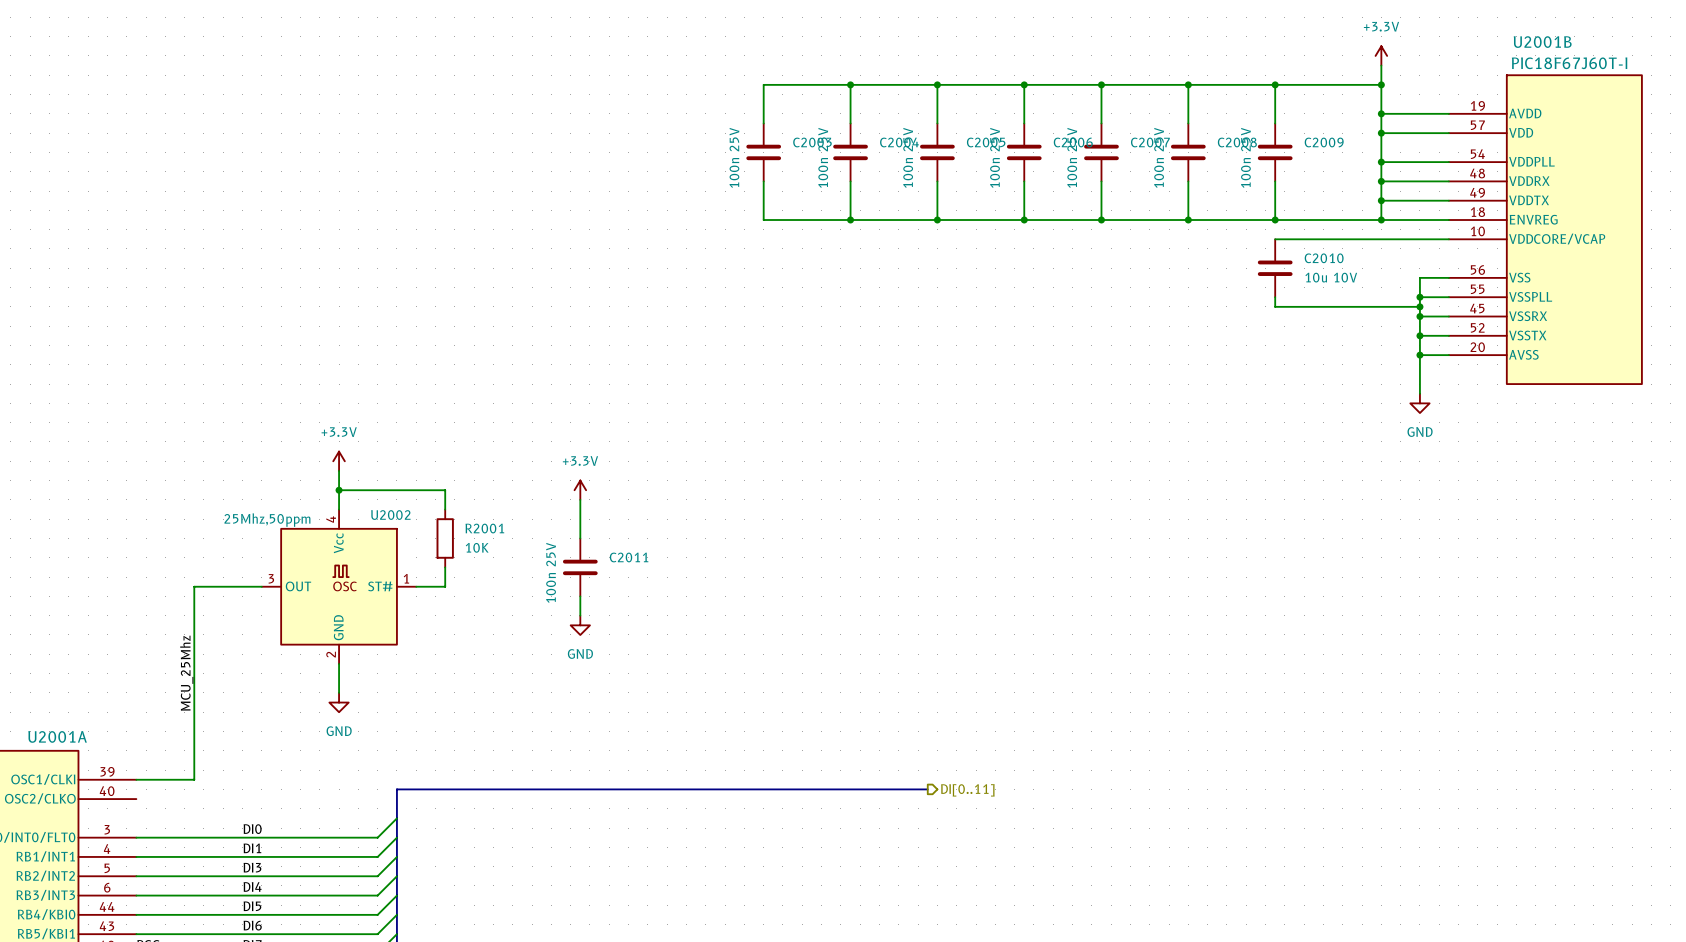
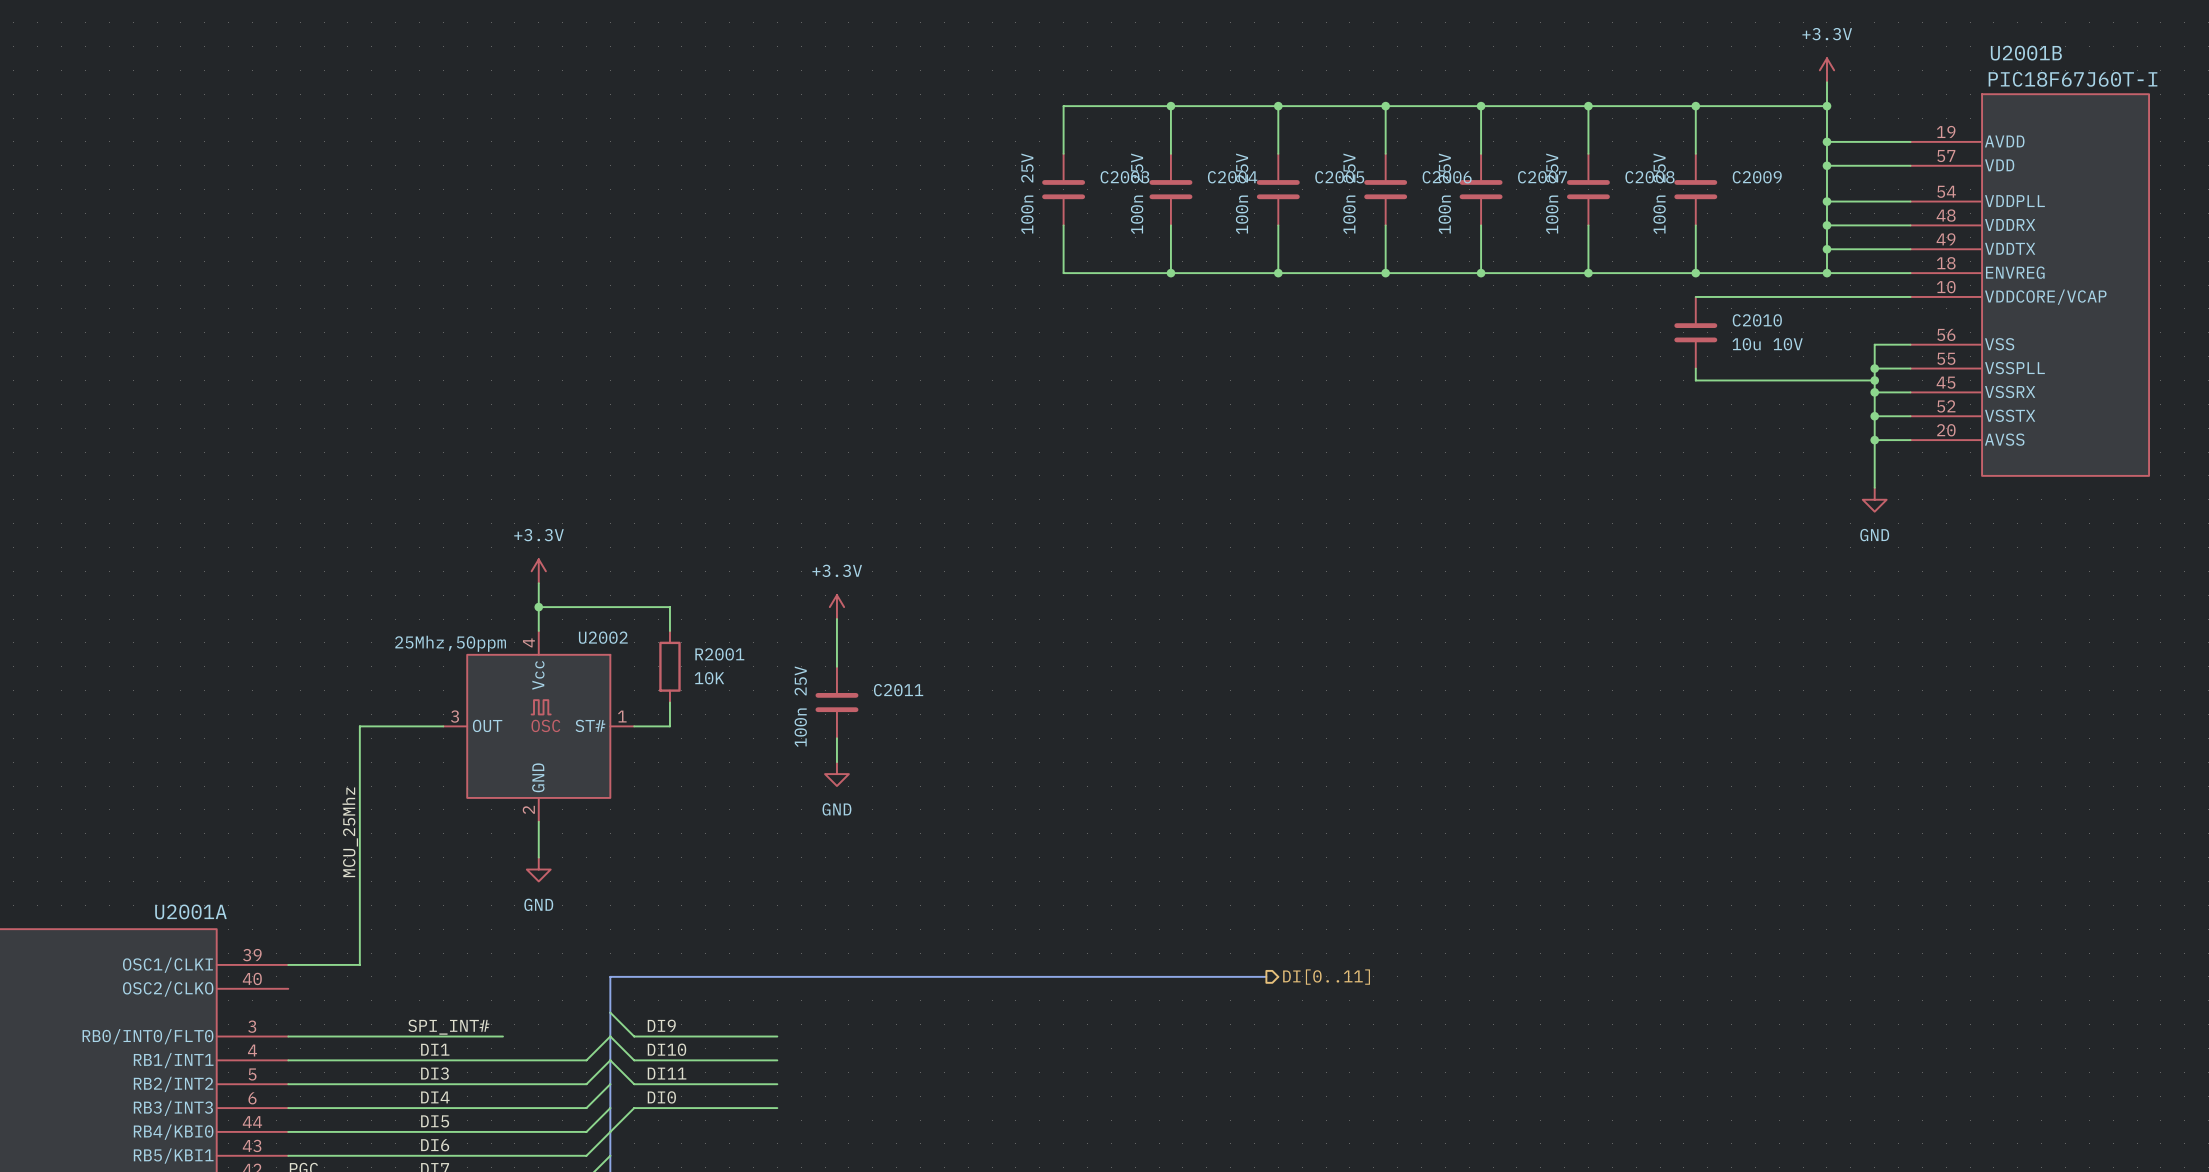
wire: (396, 818) (377, 837) (310, 837) -> (610, 1012) (634, 1036) (777, 1036)
label: DI0 (252, 829) -> none
label: none -> DI9 (661, 1025)
label: none -> SPI_INT# (448, 1027)
wire: none -> (610, 1036) (634, 1060) (777, 1060)
label: none -> DI10 (666, 1049)
wire: none -> (610, 1060) (634, 1084) (777, 1084)
label: none -> DI11 (667, 1073)
label: none -> DI0 (661, 1097)
wire: none -> (777, 1108) (634, 1108) (610, 1131)

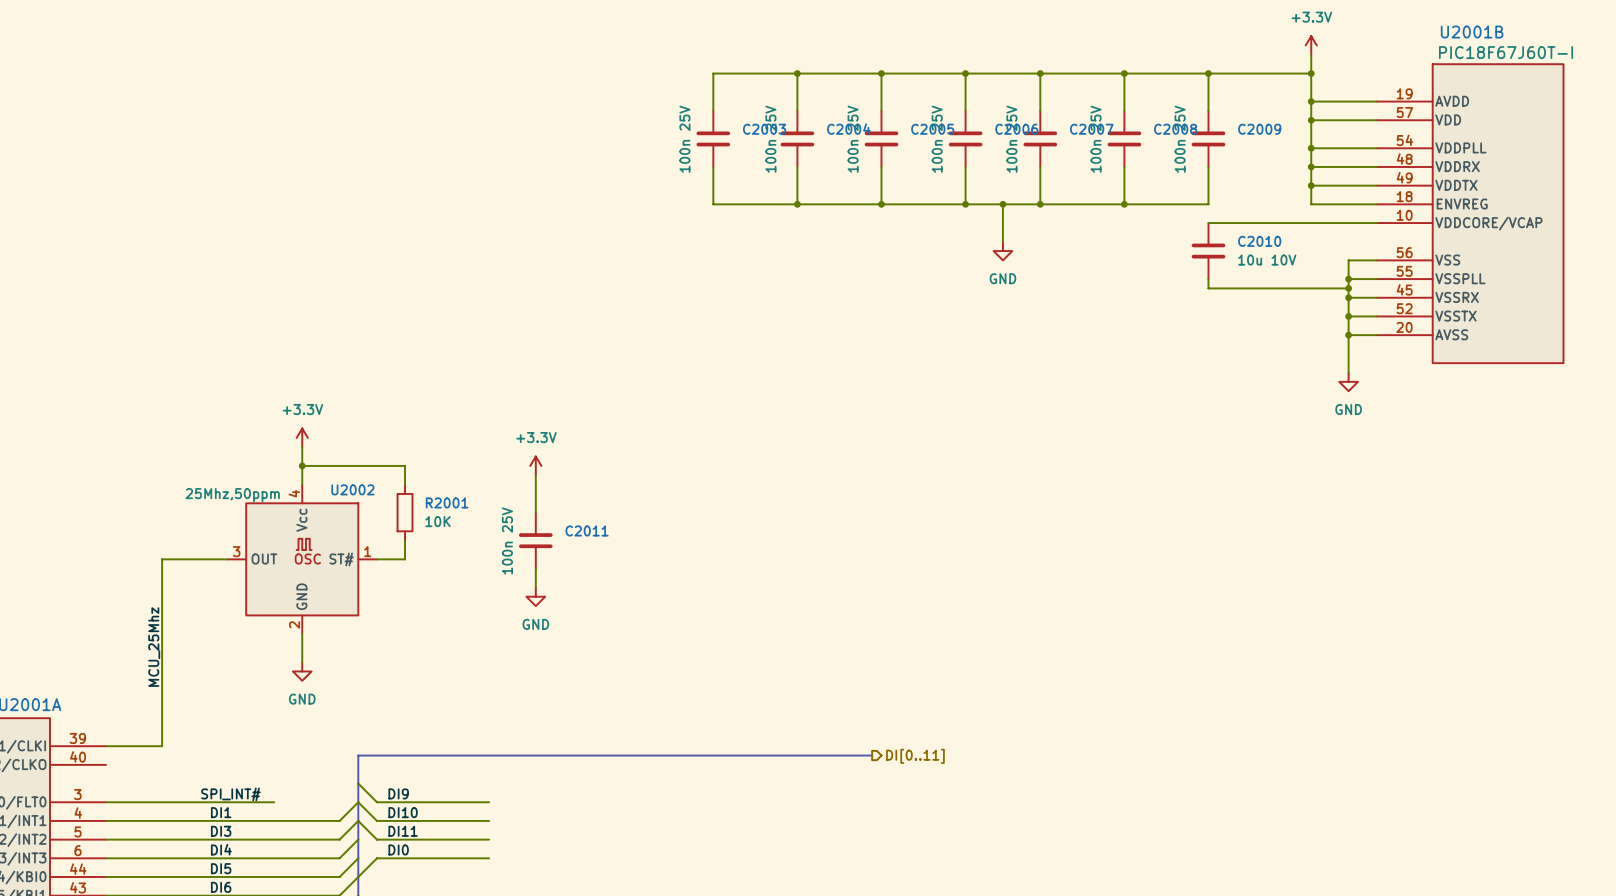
wire: none -> (1002, 204) (1002, 241)
junction: none -> (1002, 204)
wire: (1695, 273) (1826, 273) -> none
junction: (1695, 273) -> none
junction: (1826, 273) -> none
power symbol: none -> GND (1002, 251)

